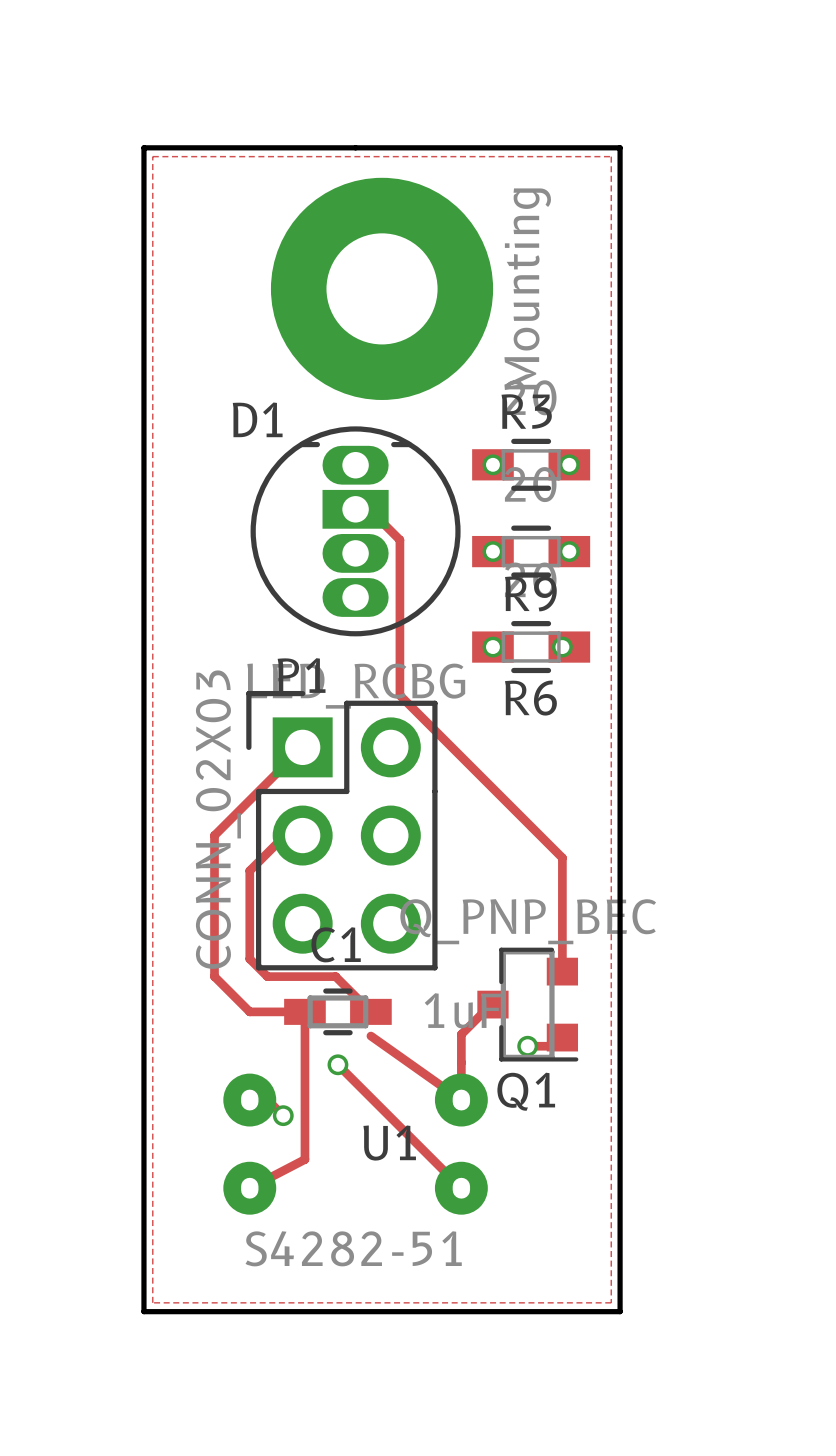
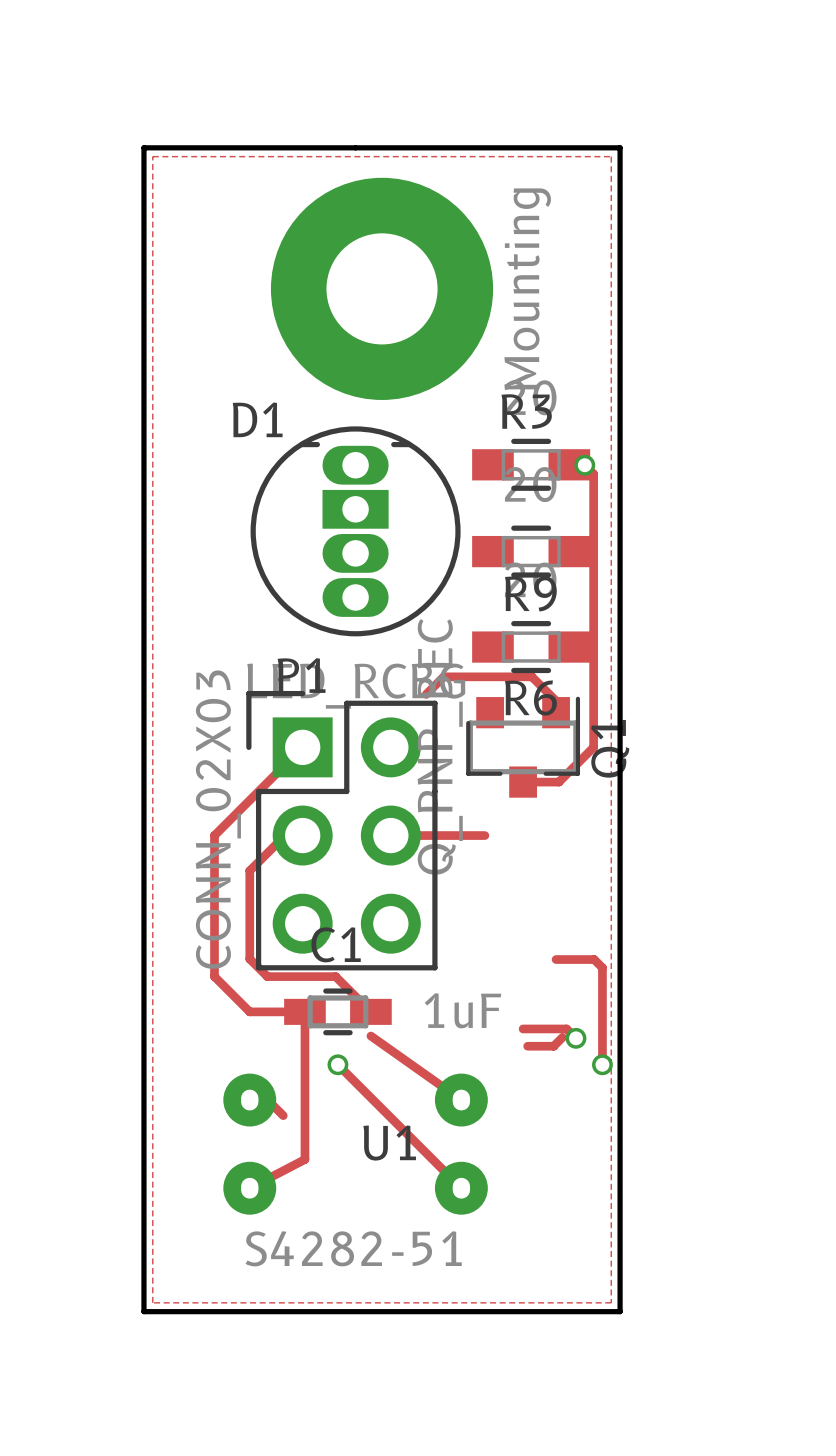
via: (492, 464) -> none
via position: (569, 464) -> (584, 465)
track: none -> (584, 465) (593, 474) (593, 747) (558, 782) (523, 782)
track: (355, 509) (369, 509) (399, 539) (399, 695) (562, 857) (562, 971) -> none
via: (492, 551) -> none
via: (569, 551) -> none
via: (492, 647) -> none
via: (562, 647) -> none
track: none -> (426, 694) (443, 676) (531, 676) (556, 700) (556, 712)
track: none -> (390, 835) (484, 835)
track: none -> (556, 959) (594, 959) (602, 967) (602, 1064)
track: (492, 1004) (461, 1034) (461, 1100) -> none
Q1 rotation: 0° (527, 1004) -> 90° counterclockwise (523, 747)
Q1 position: (527, 1004) -> (523, 747)
track: none -> (523, 1028) (566, 1028) (576, 1038)
via: none -> (576, 1038)
via: (527, 1046) -> none
via: none -> (602, 1064)
via: (283, 1115) -> none

